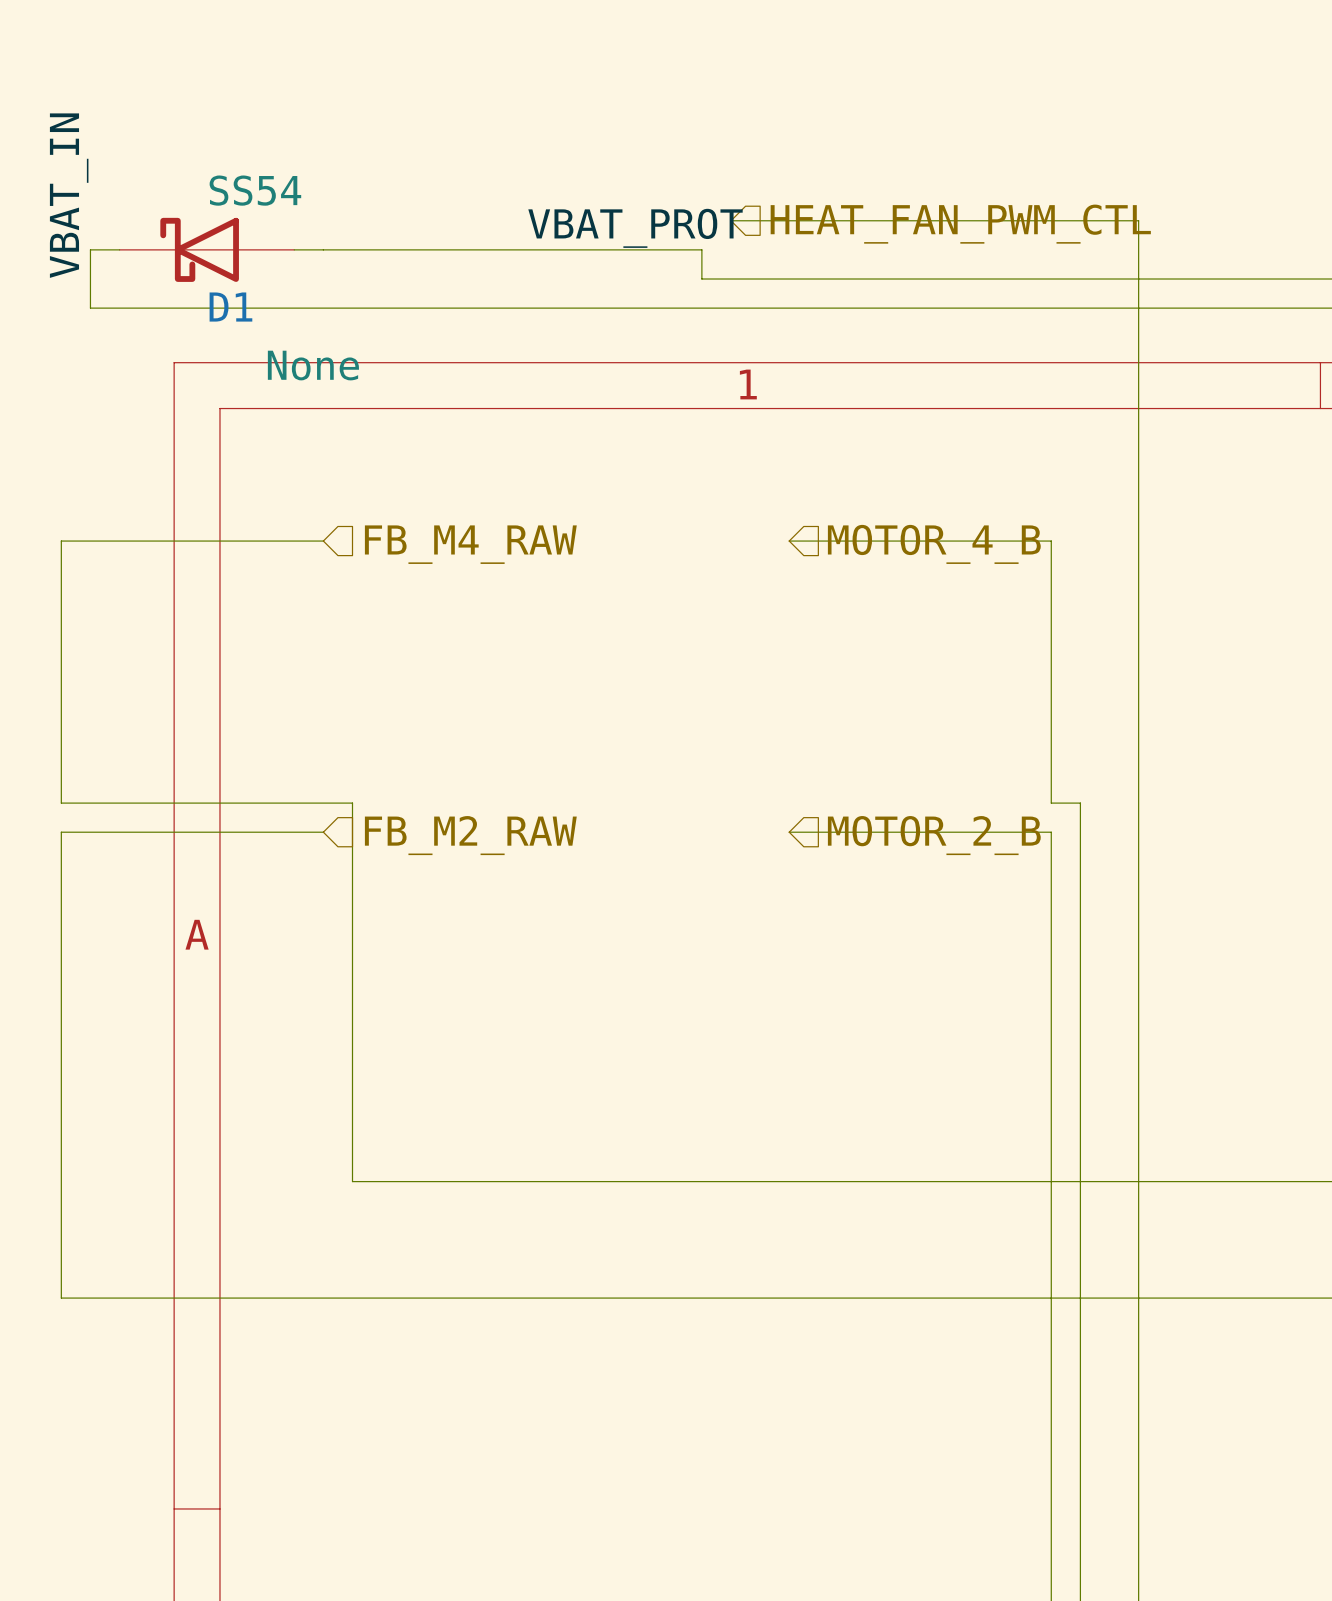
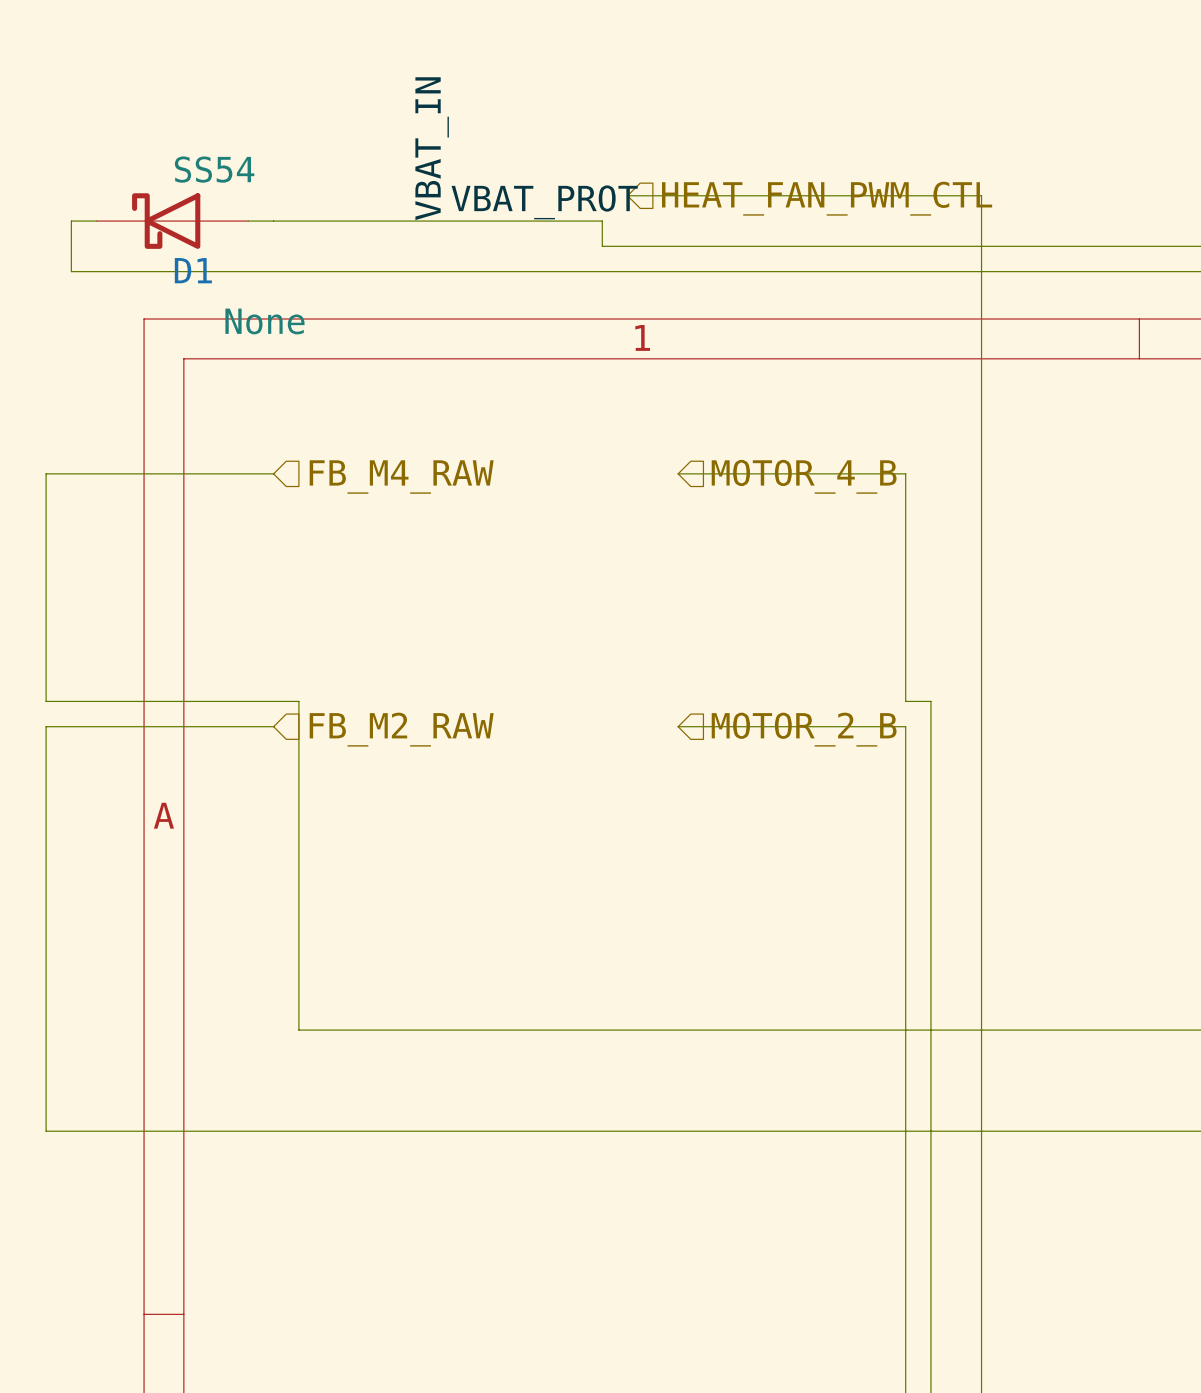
label position: VBAT_IN (69, 195) -> VBAT_IN (432, 148)

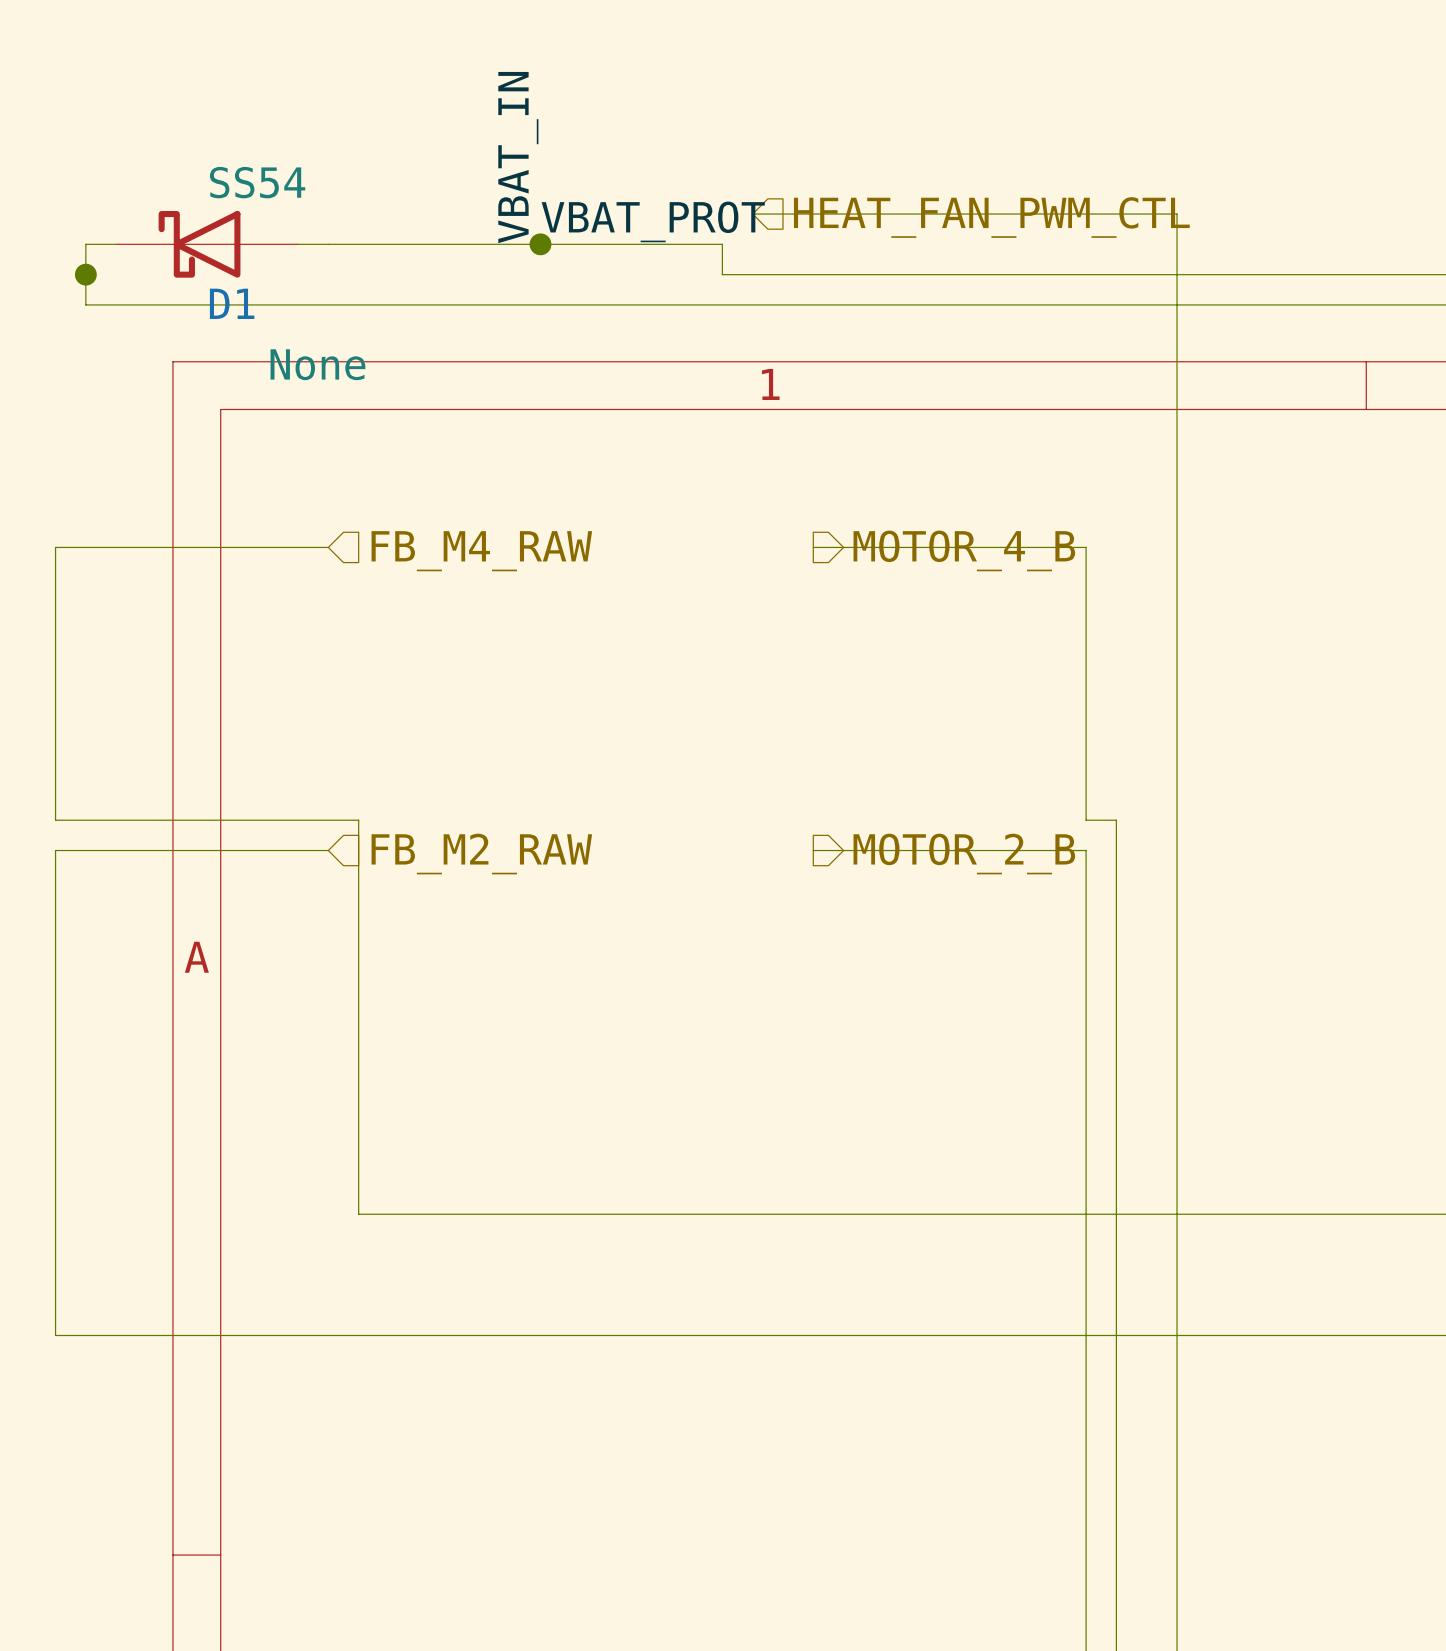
junction: none -> (540, 244)
junction: none -> (85, 274)
hierarchical label shape: input (804, 476) -> output (964, 550)
hierarchical label shape: input (804, 729) -> output (964, 854)

